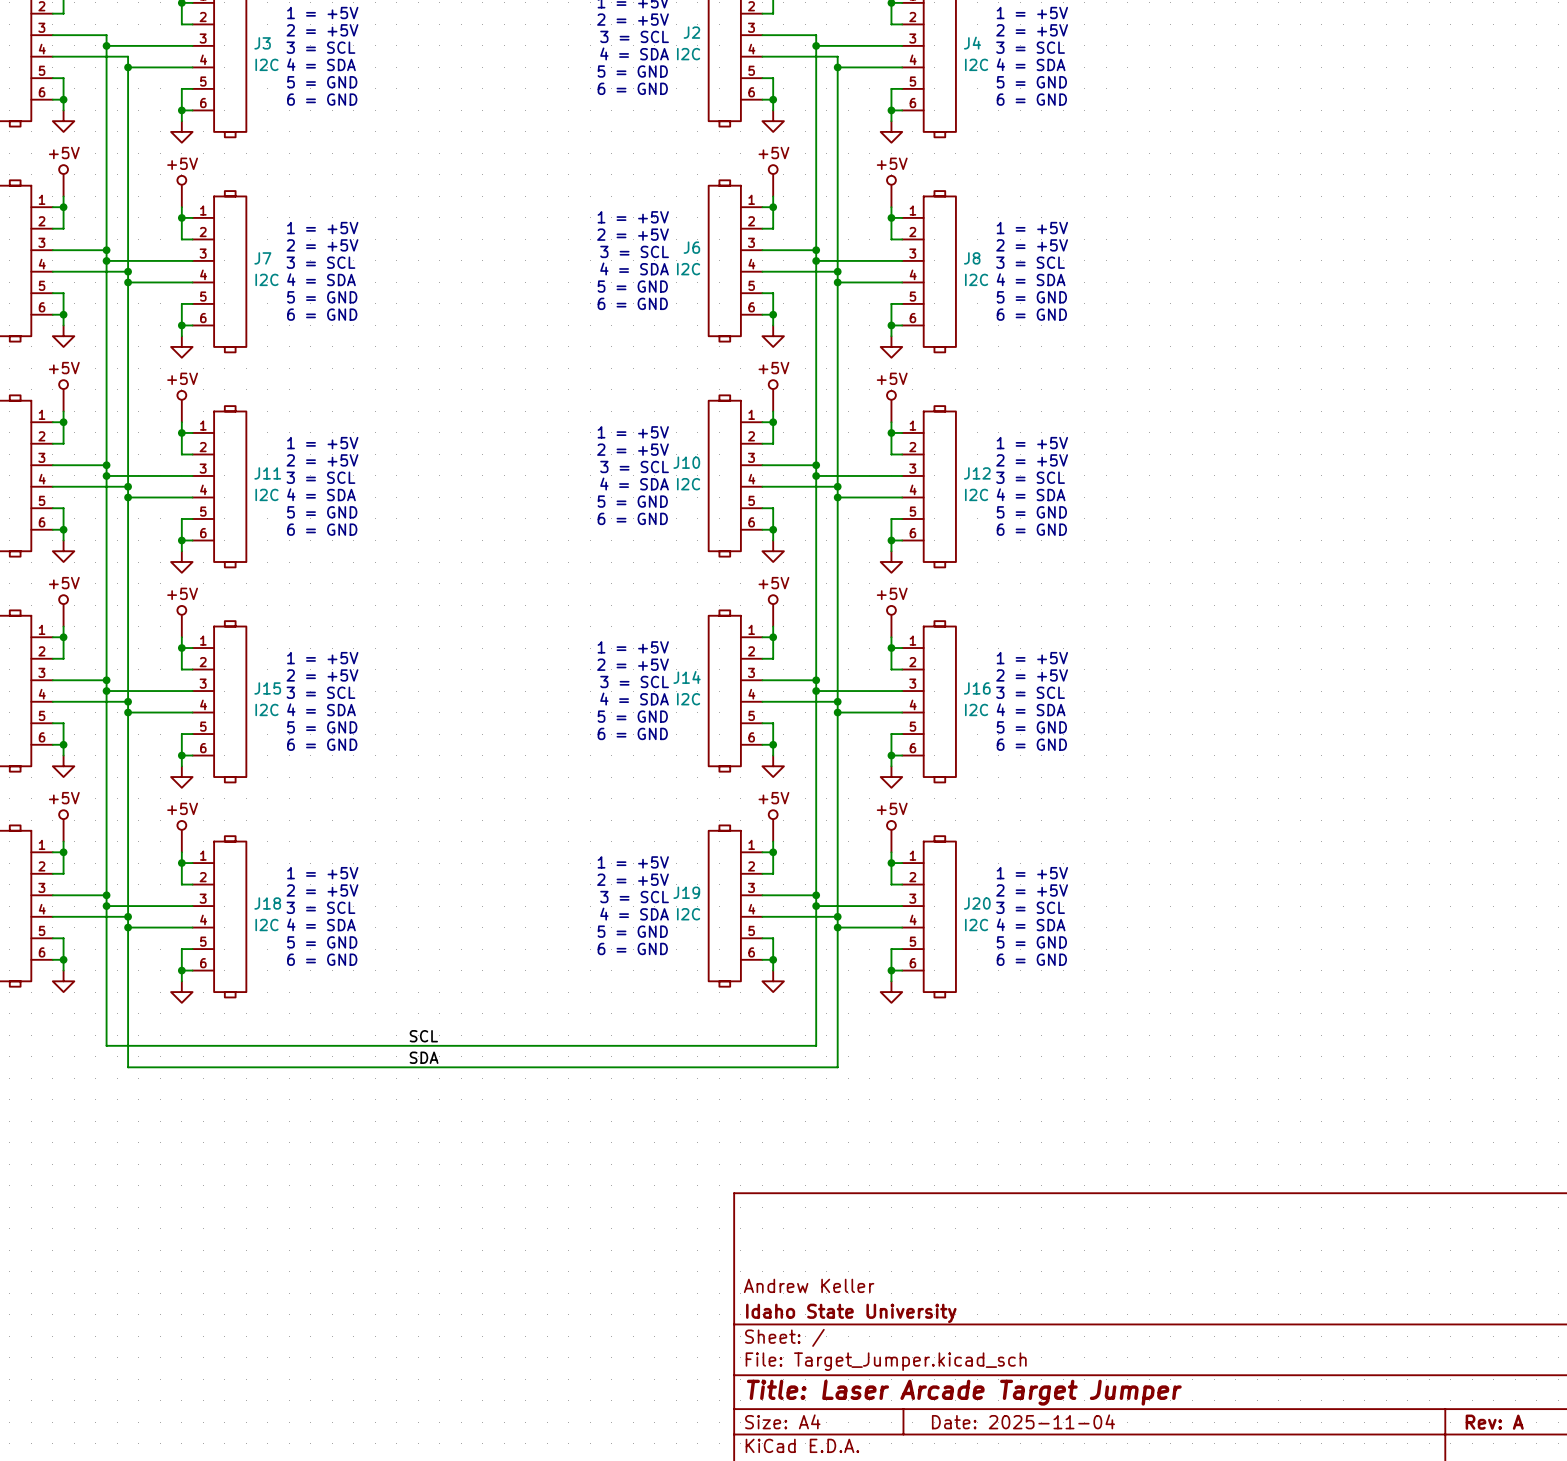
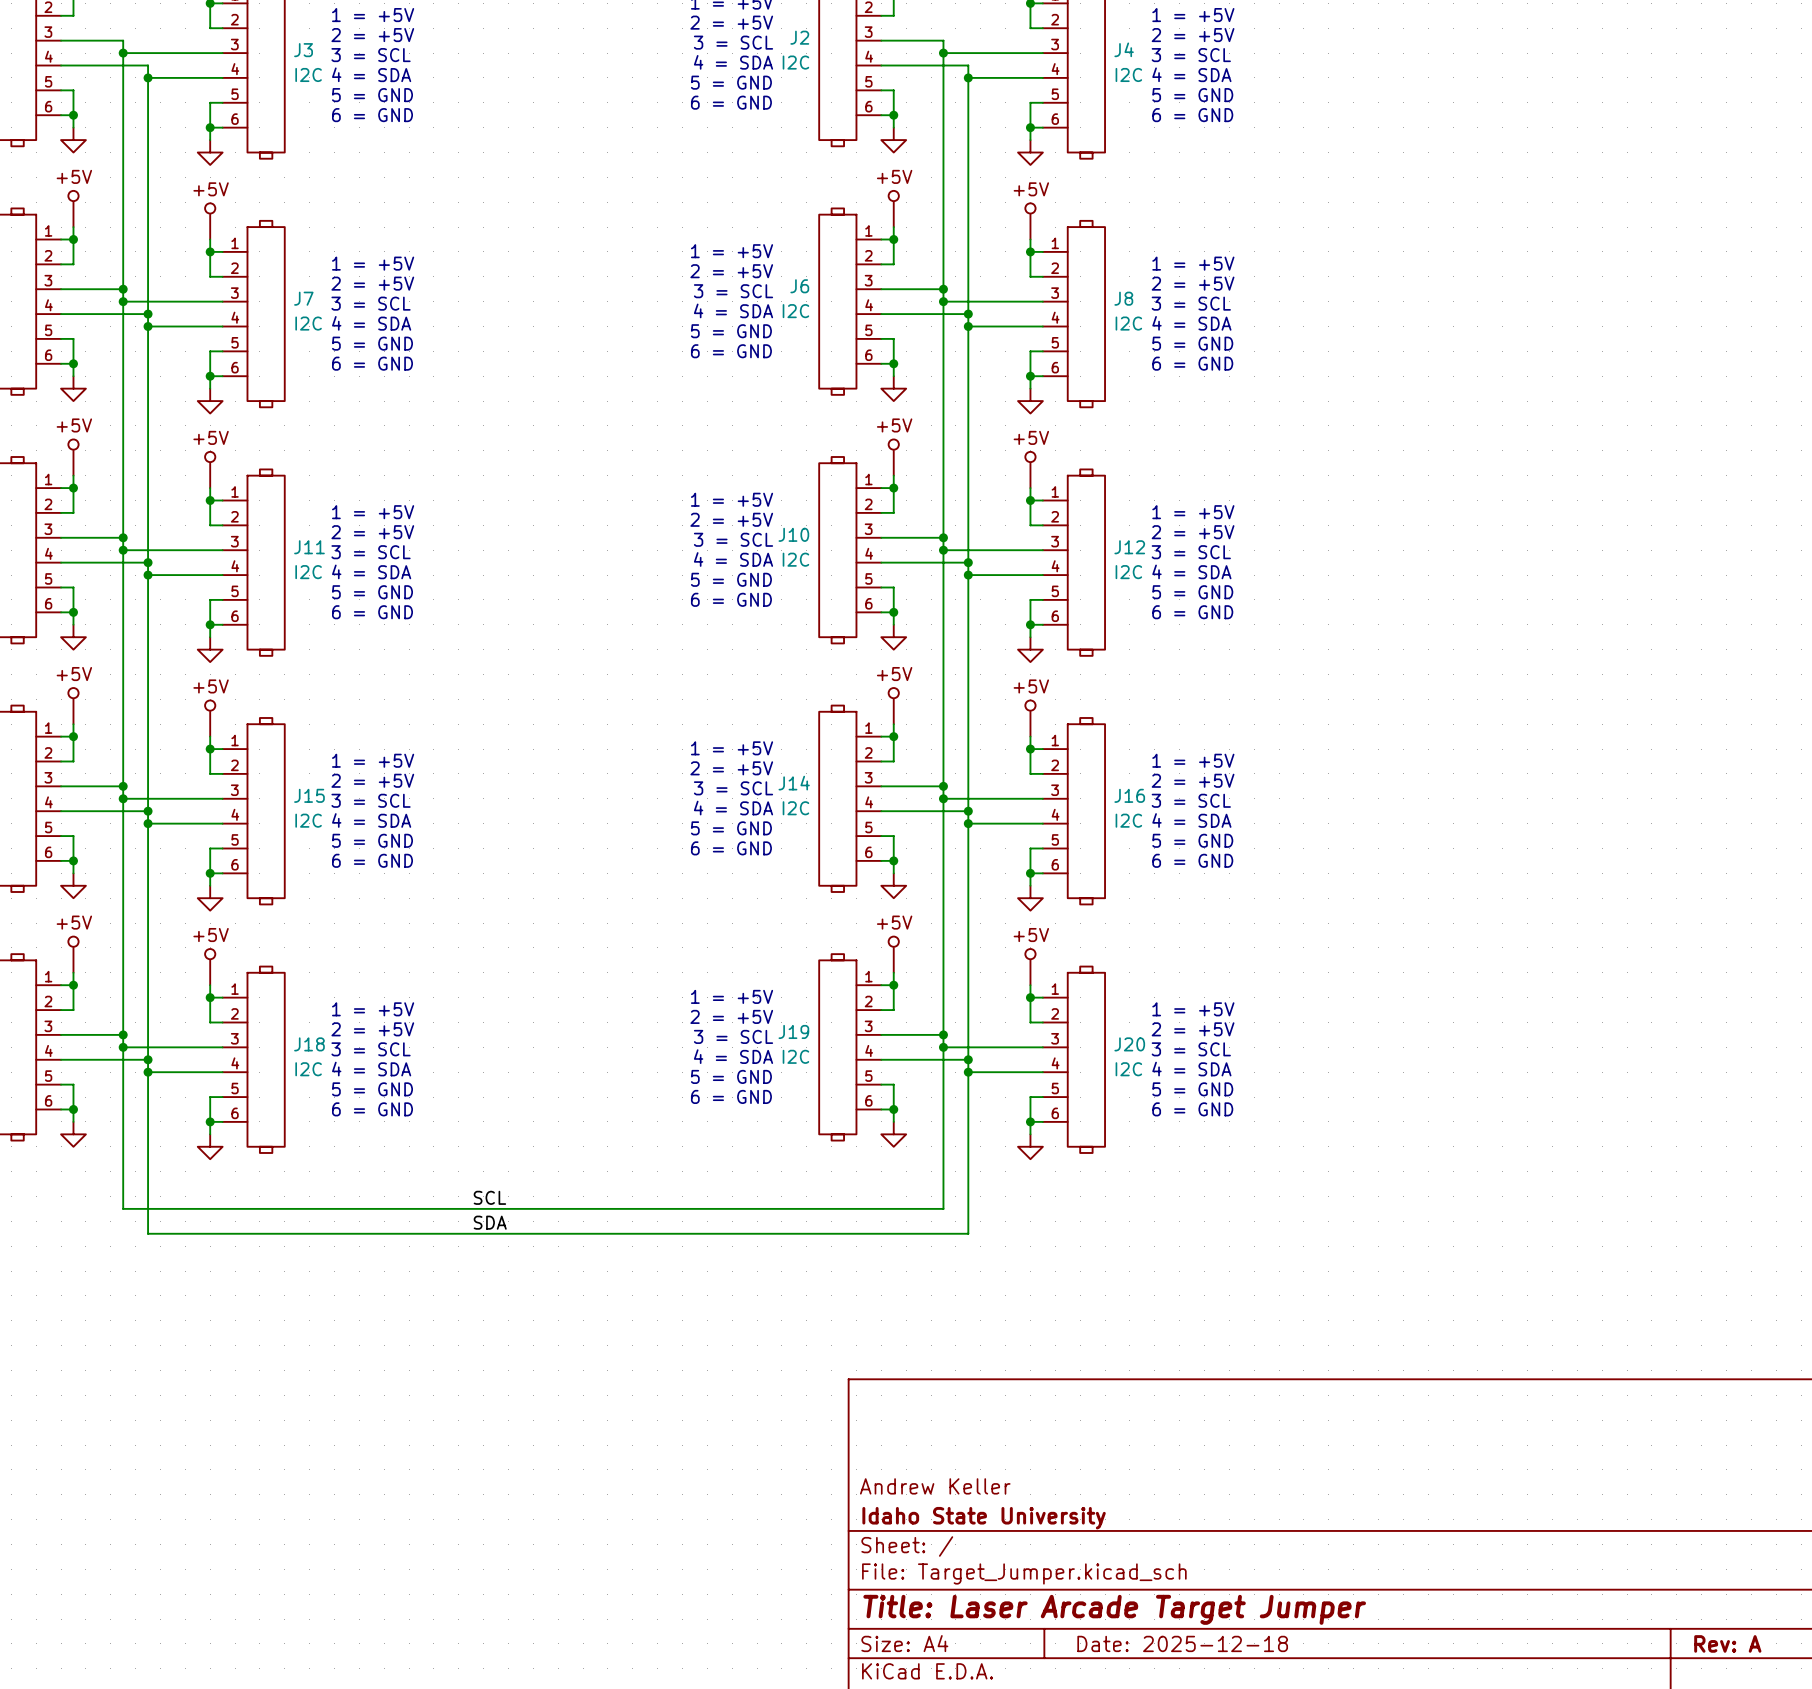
title block: Date: 2025-11-04 (1023, 1421) -> Date: 2025-12-18 (1182, 1643)

